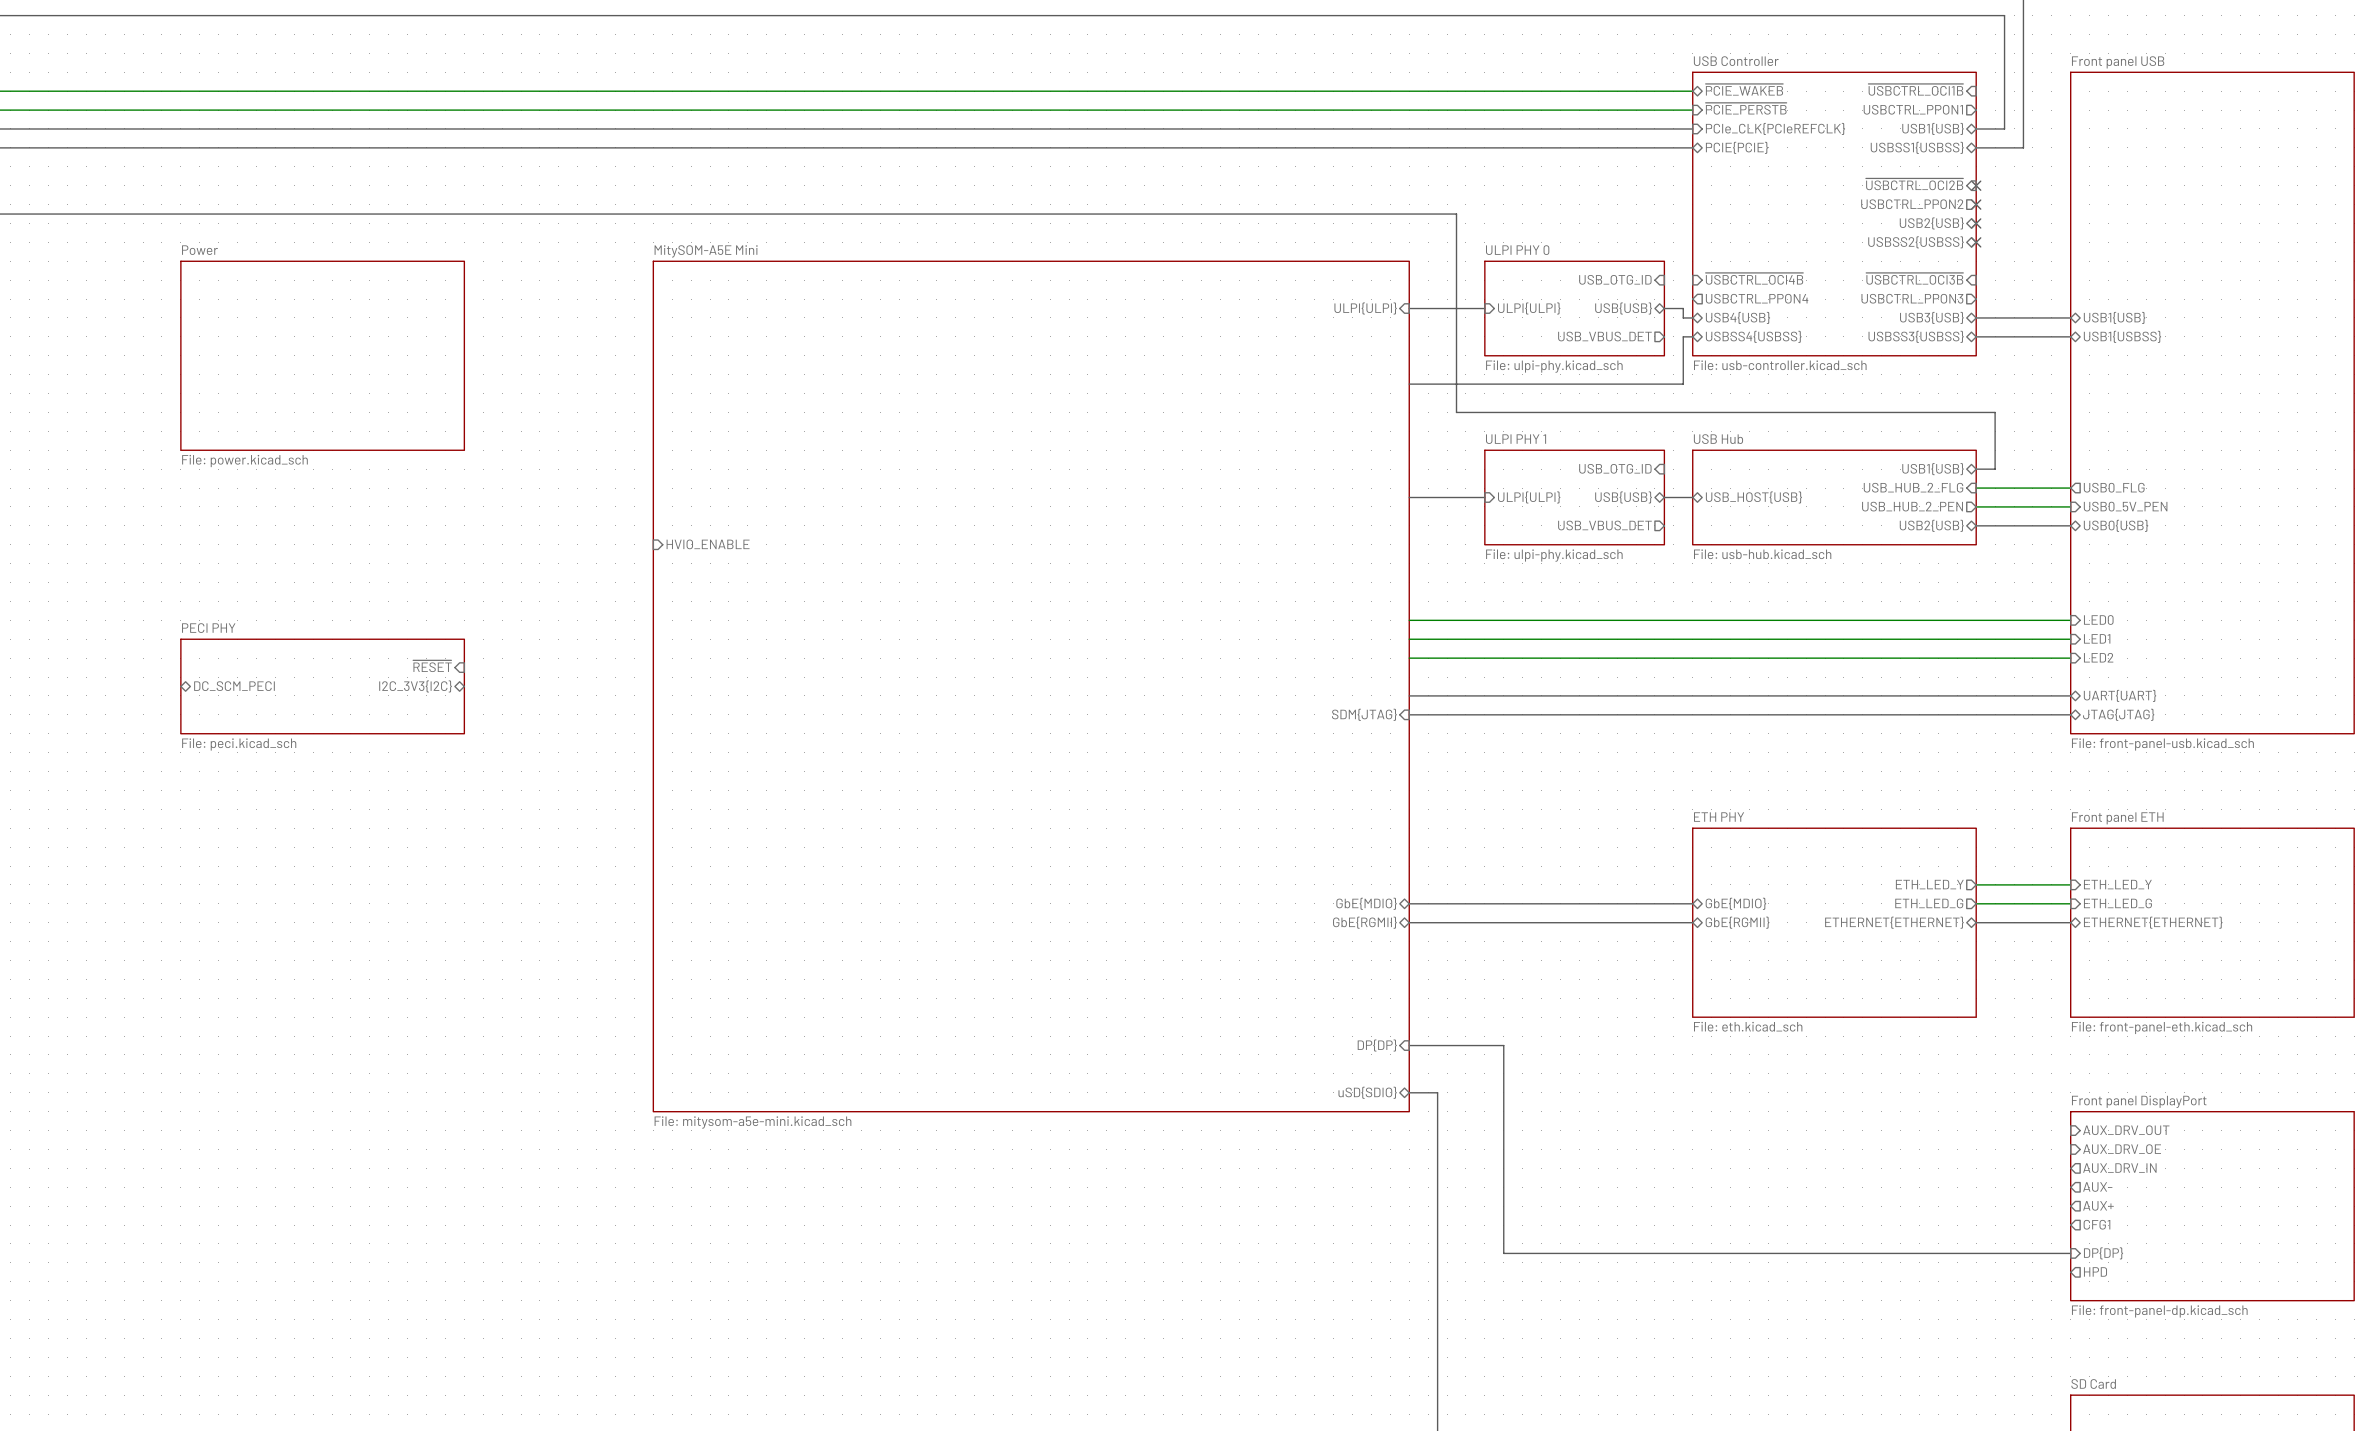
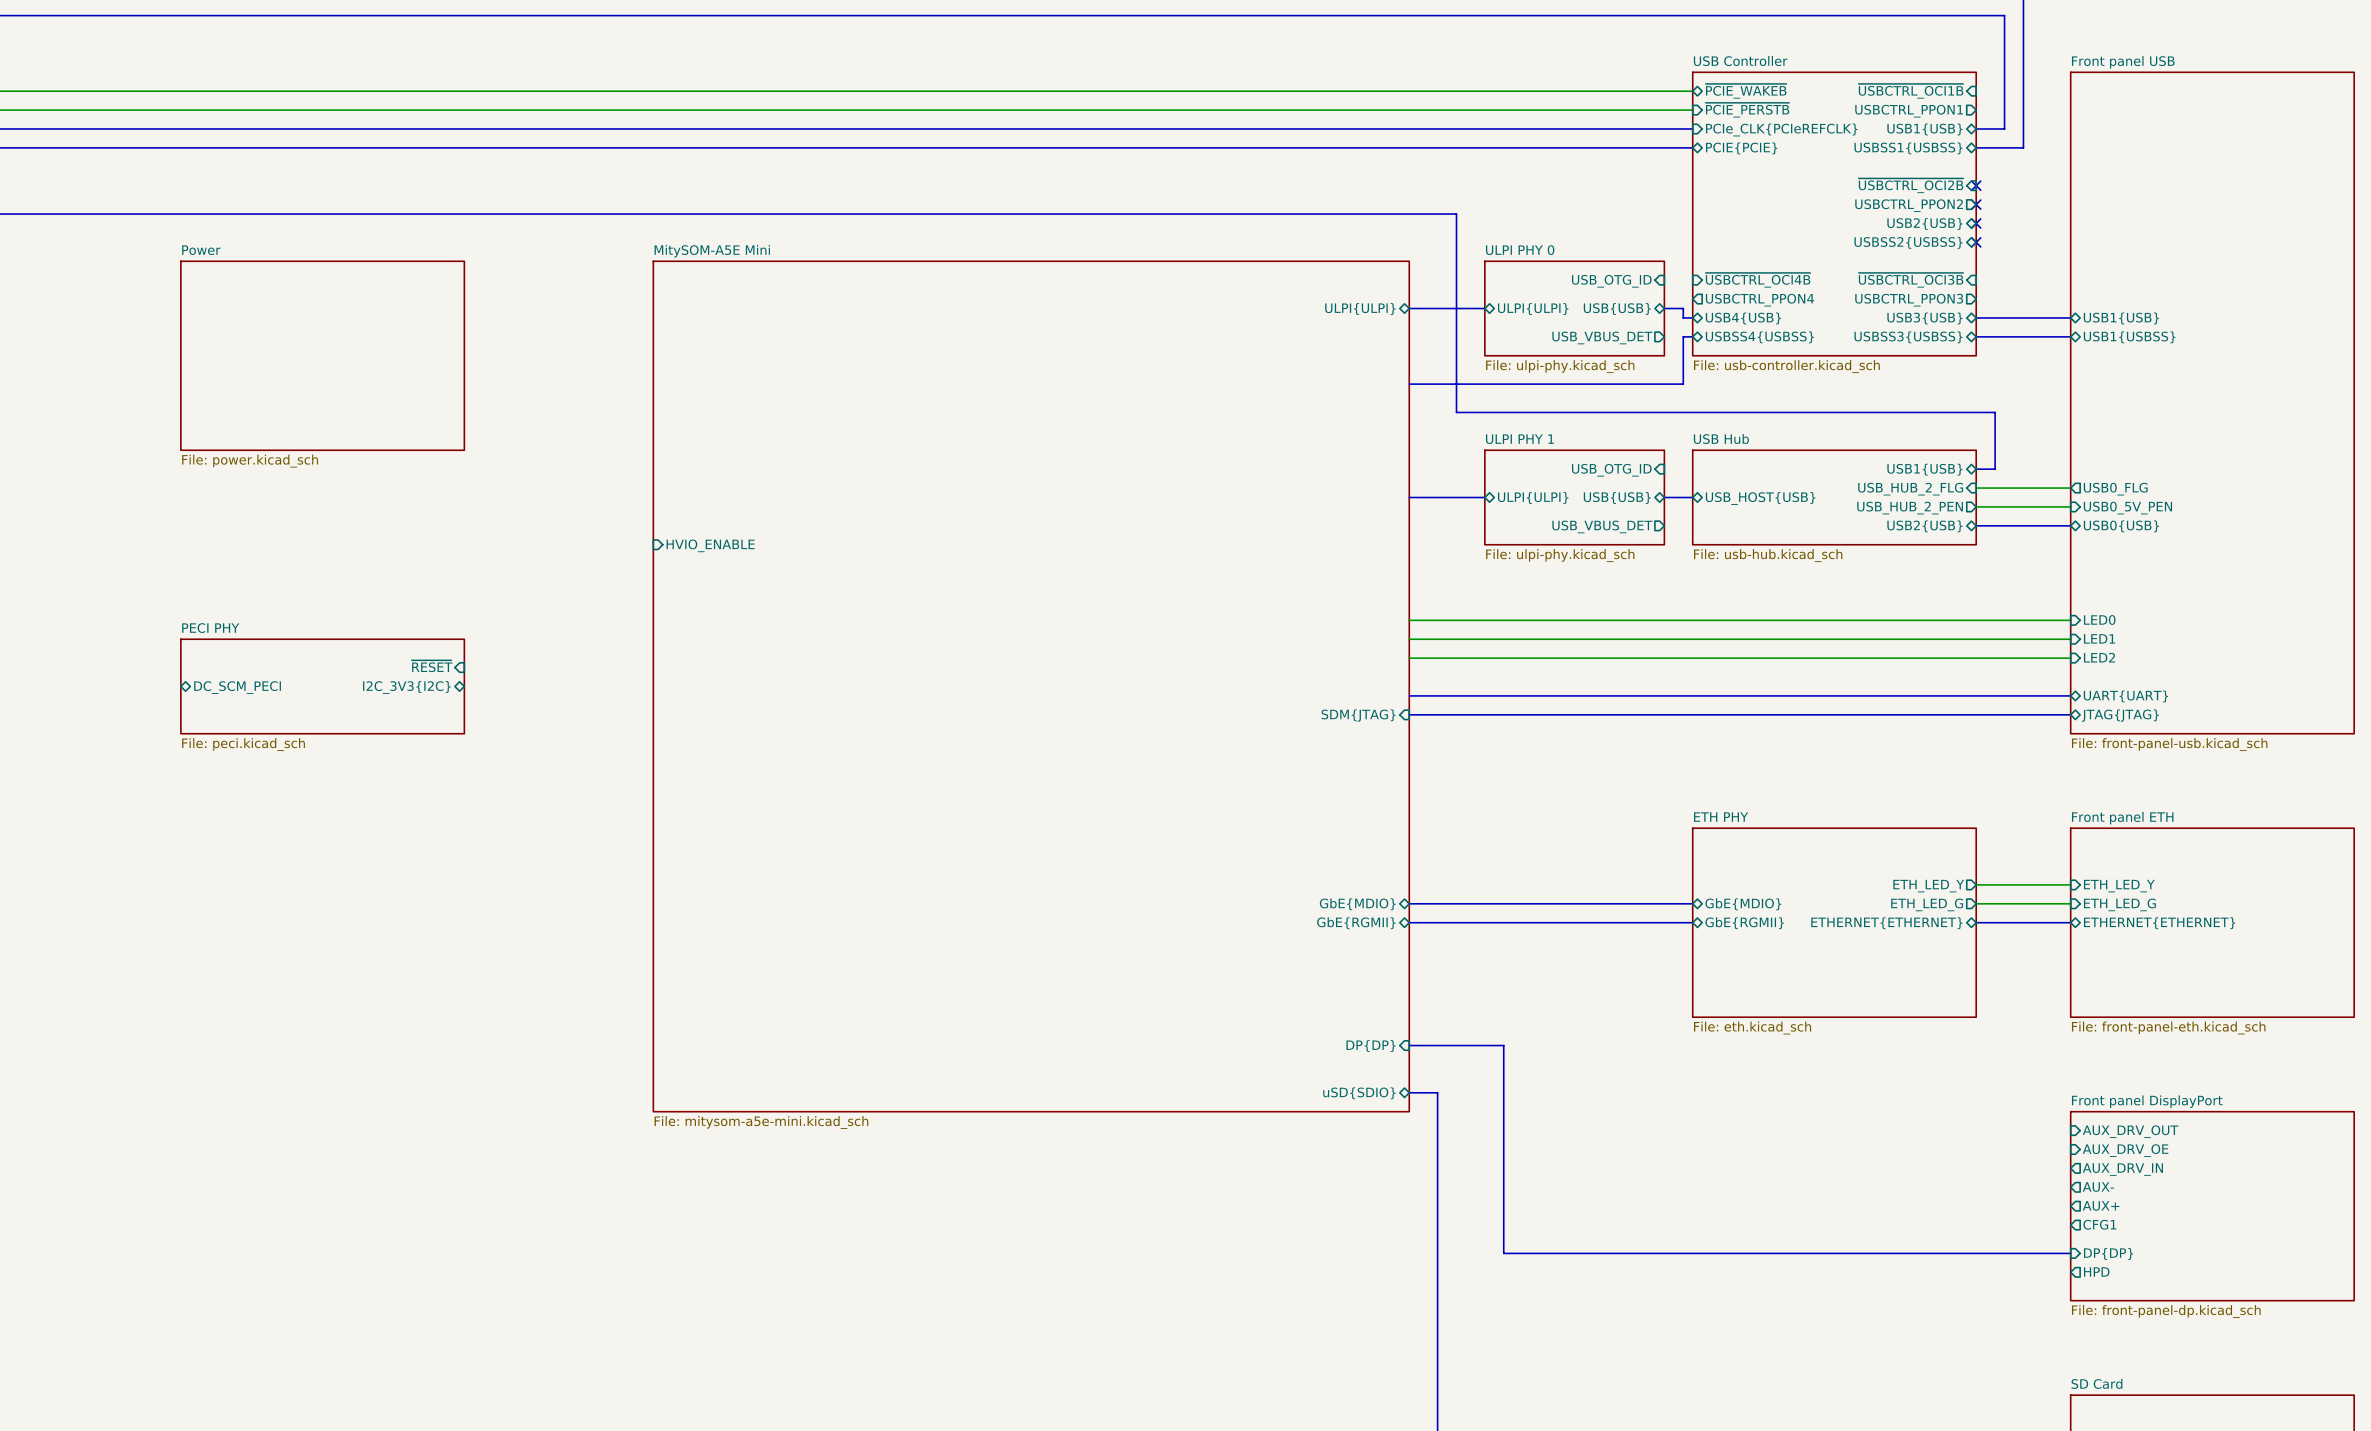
sheet pin shape: input (1365, 308) -> bidirectional (1360, 309)
sheet pin shape: input (1529, 308) -> bidirectional (1533, 309)
sheet pin shape: input (1529, 497) -> bidirectional (1533, 498)

